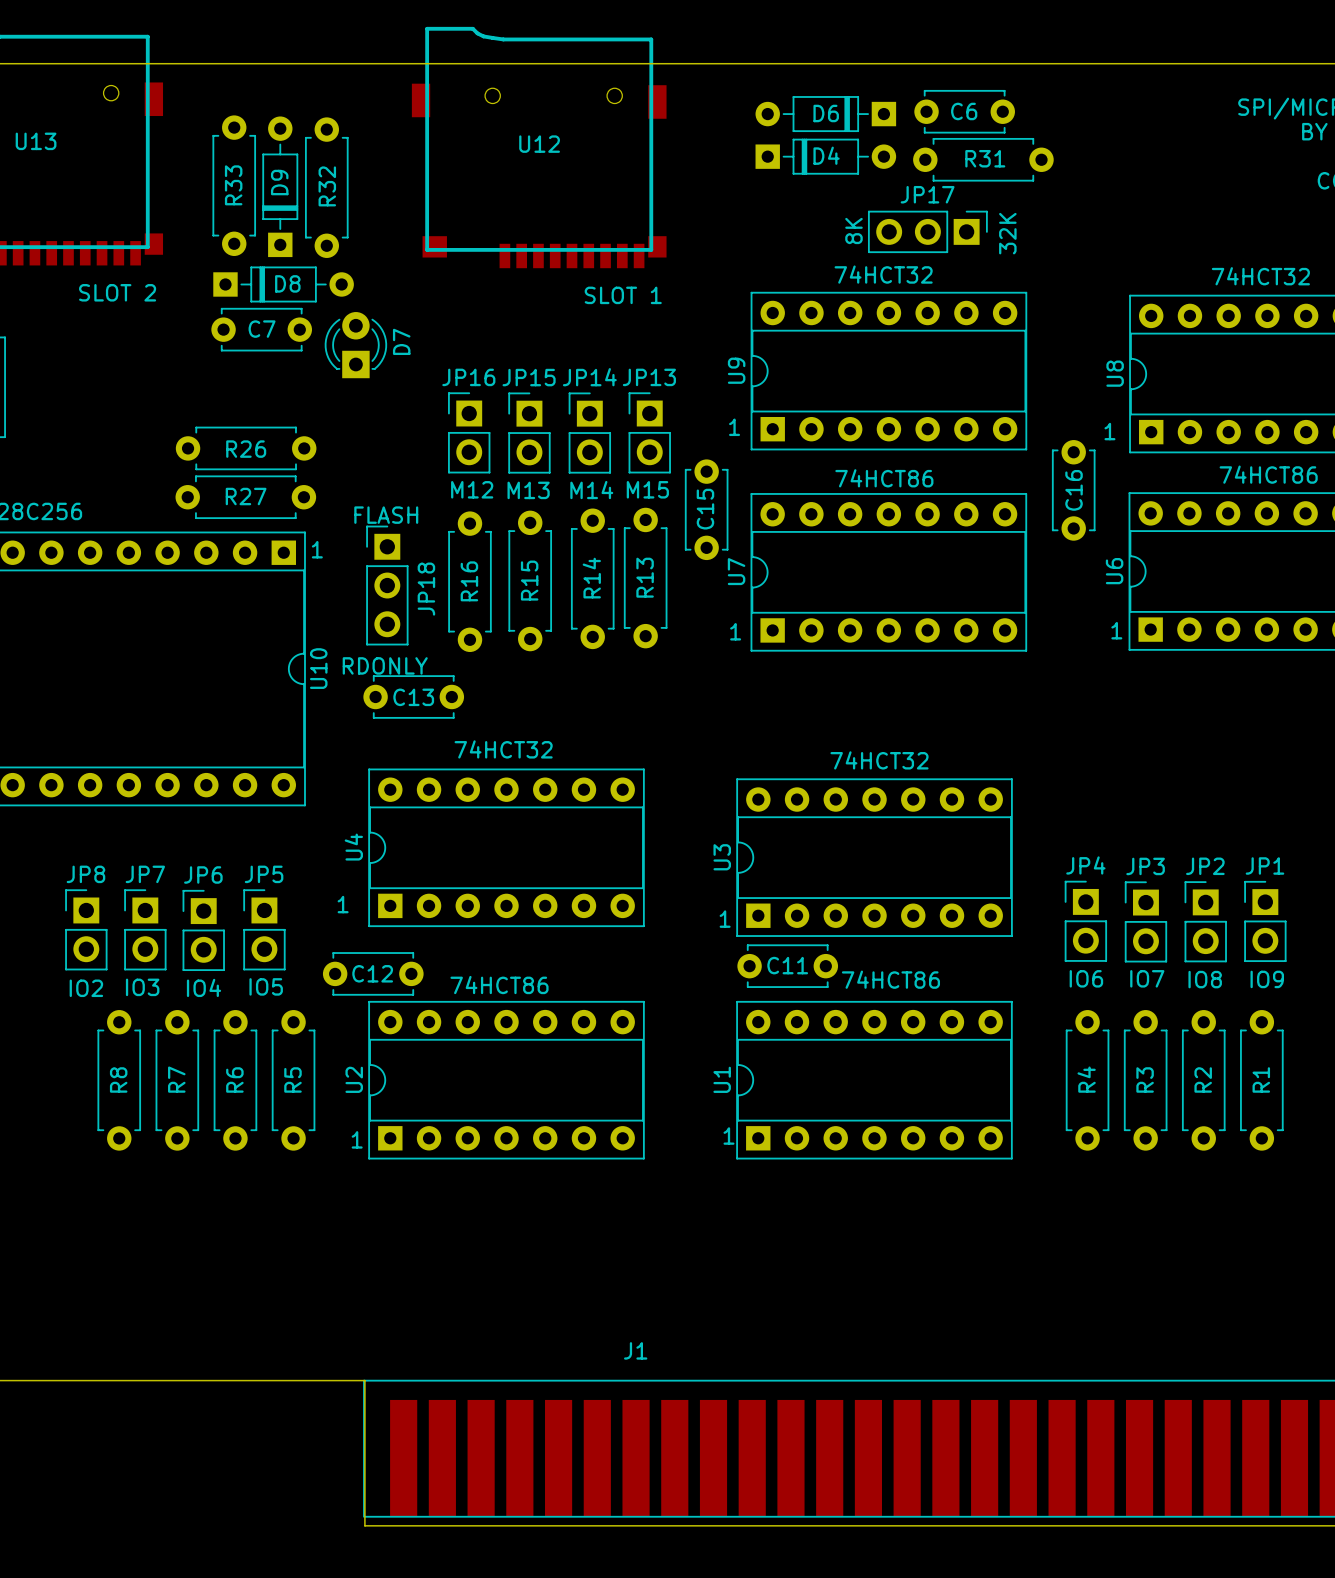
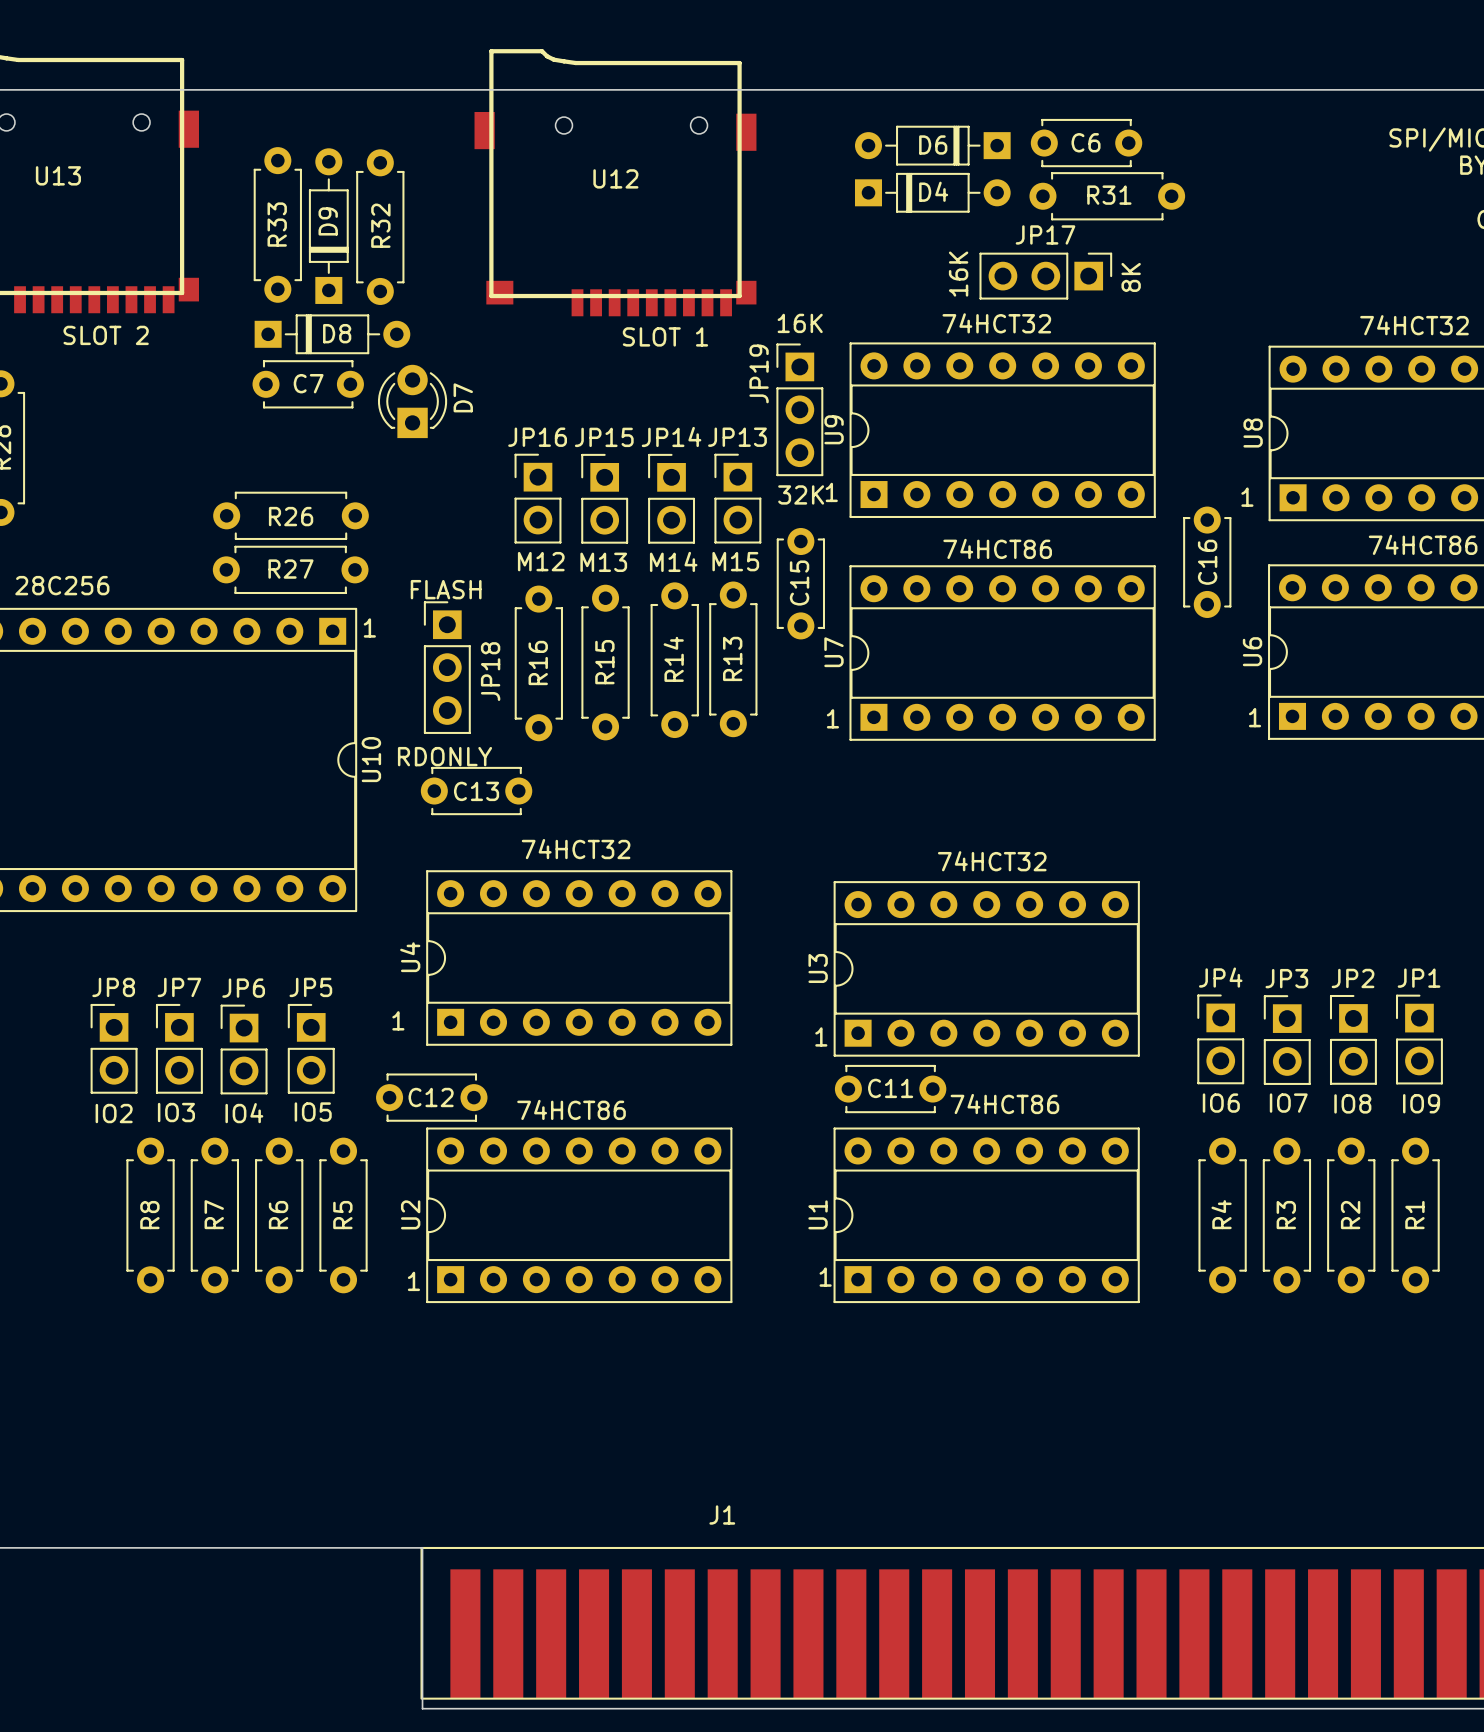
text: 8K (853, 230) -> 16K (958, 274)
text: 32K (1007, 233) -> 8K (1131, 277)
text: none -> 16K (800, 323)
text position: SLOT 2 (117, 292) -> SLOT 2 (106, 335)
text position: SLOT 1 (623, 295) -> SLOT 1 (665, 336)
JP19: none -> (799, 409)
text: none -> 32K (801, 494)

